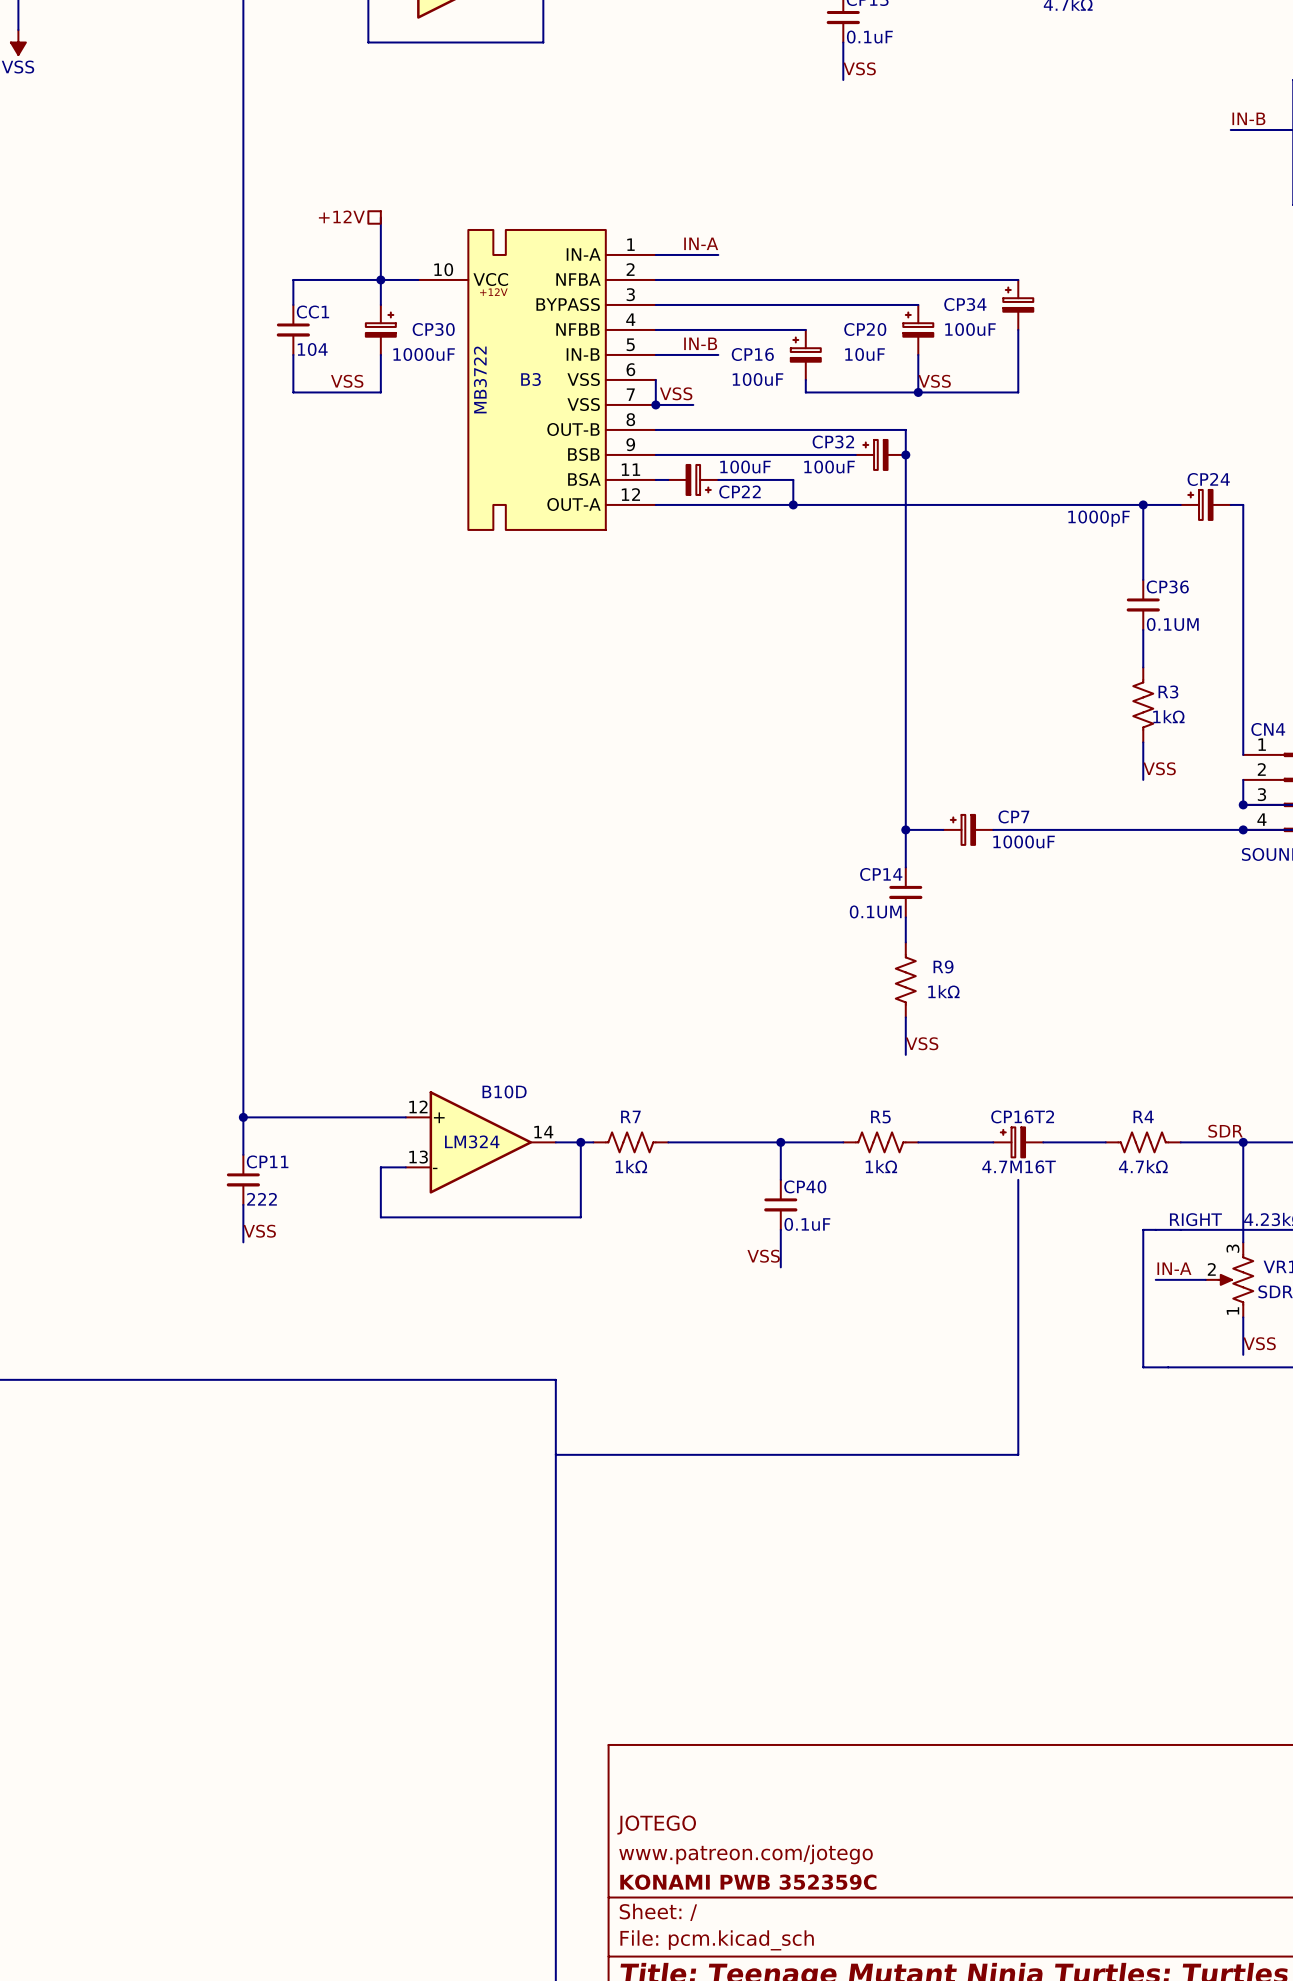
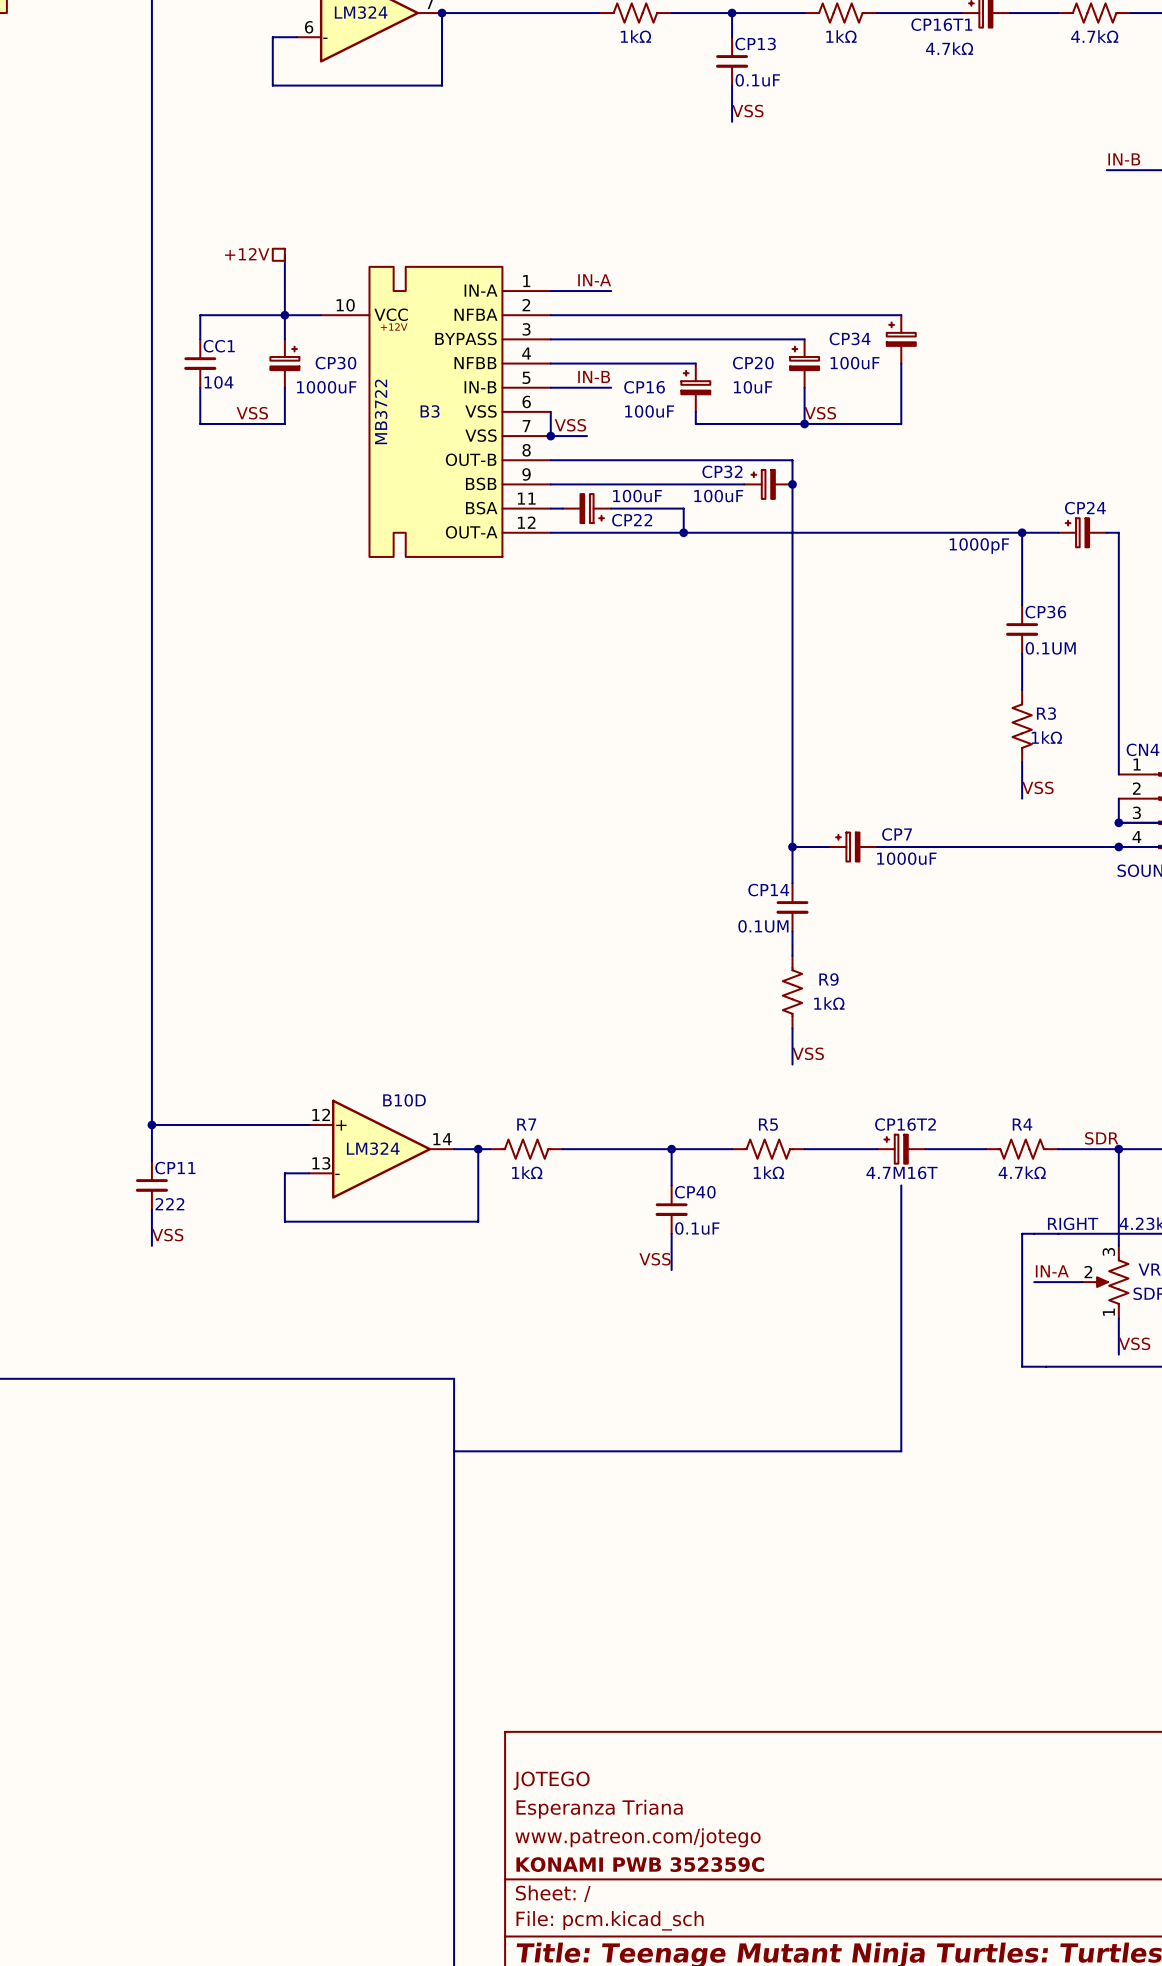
title block: none -> JOTEGO (551, 1780)
title block: JOTEGO (656, 1825) -> Esperanza Triana (599, 1809)

